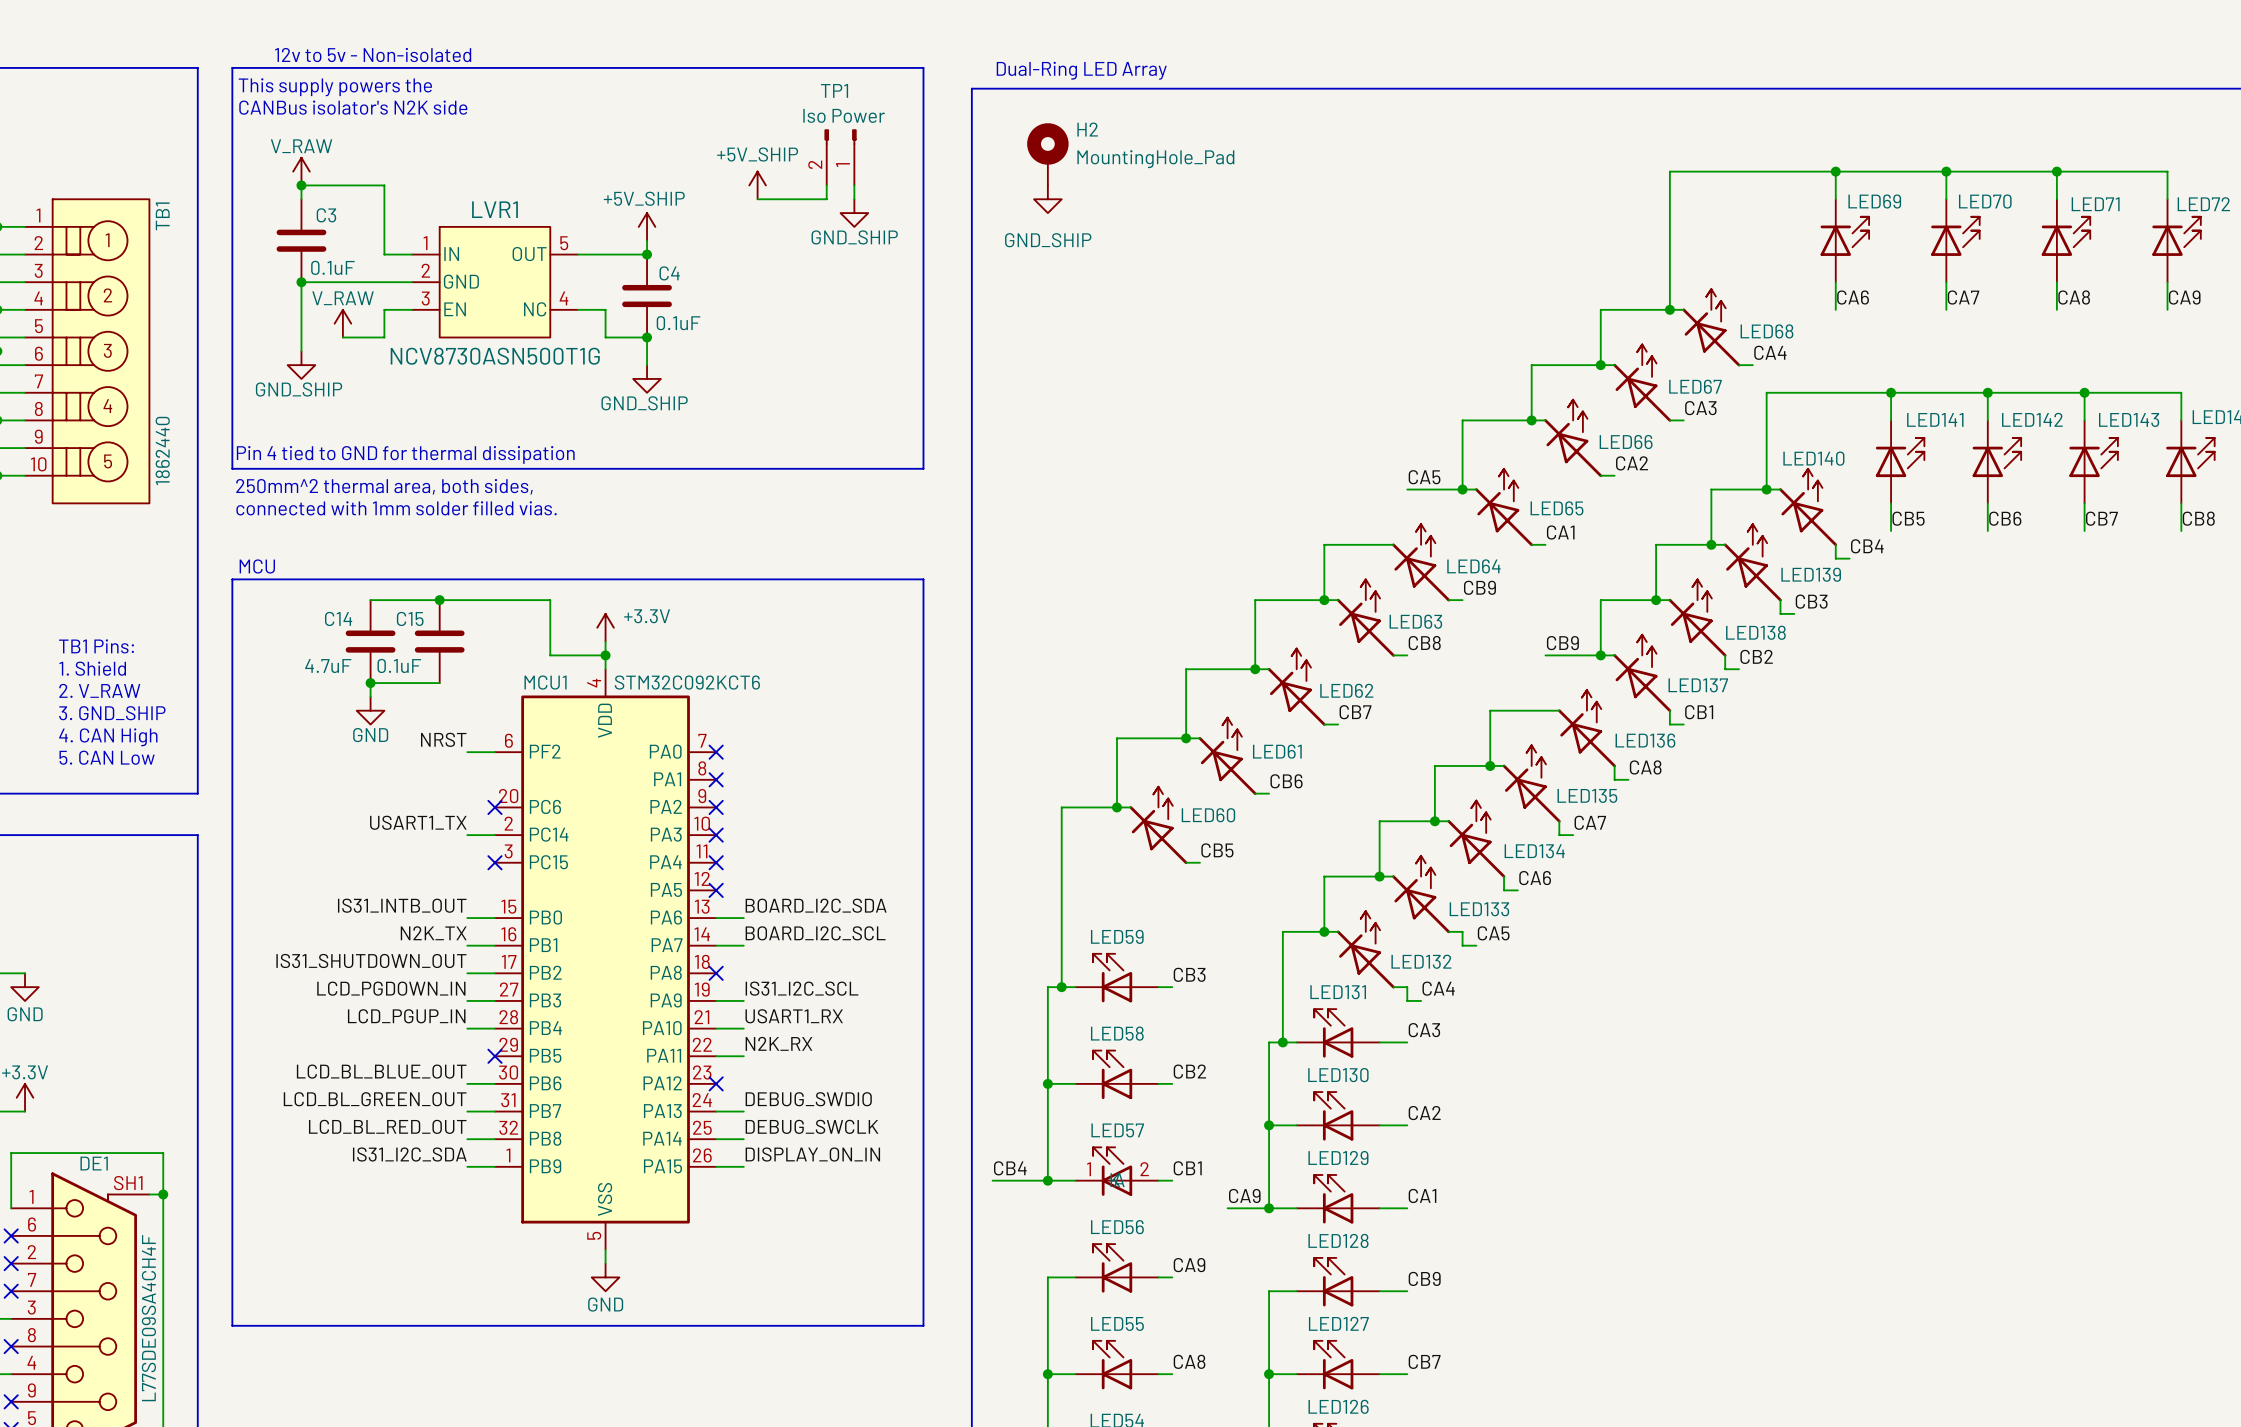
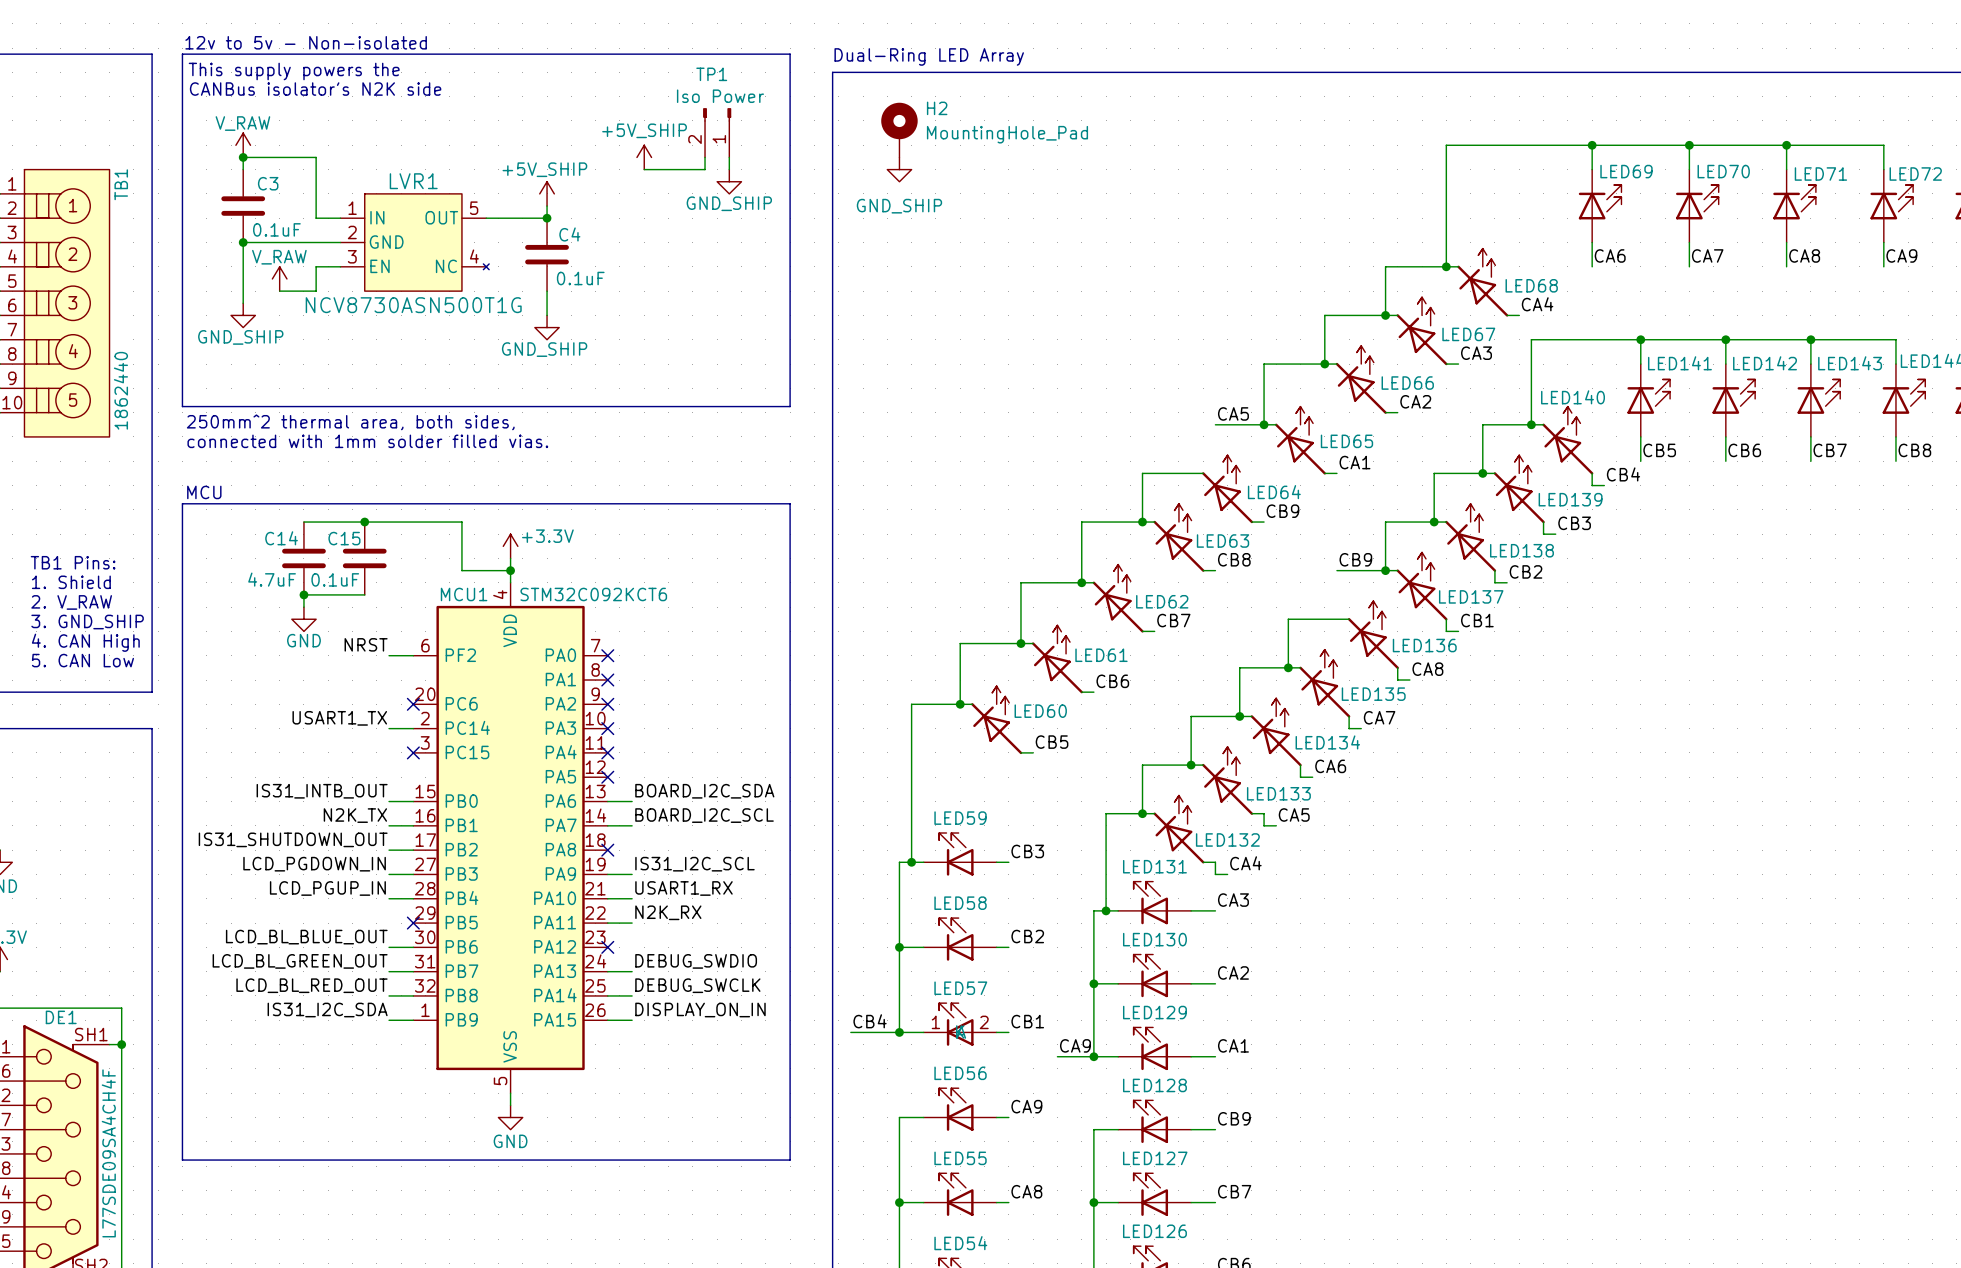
LVR1 symbol: [412, 226, 578, 338] -> [340, 193, 490, 292]
wire: (577, 309) (605, 309) (605, 337) (647, 337) -> none
junction: (647, 337) -> none
text: Pin 4 tied to GND for thermal dissipation (405, 454) -> none

